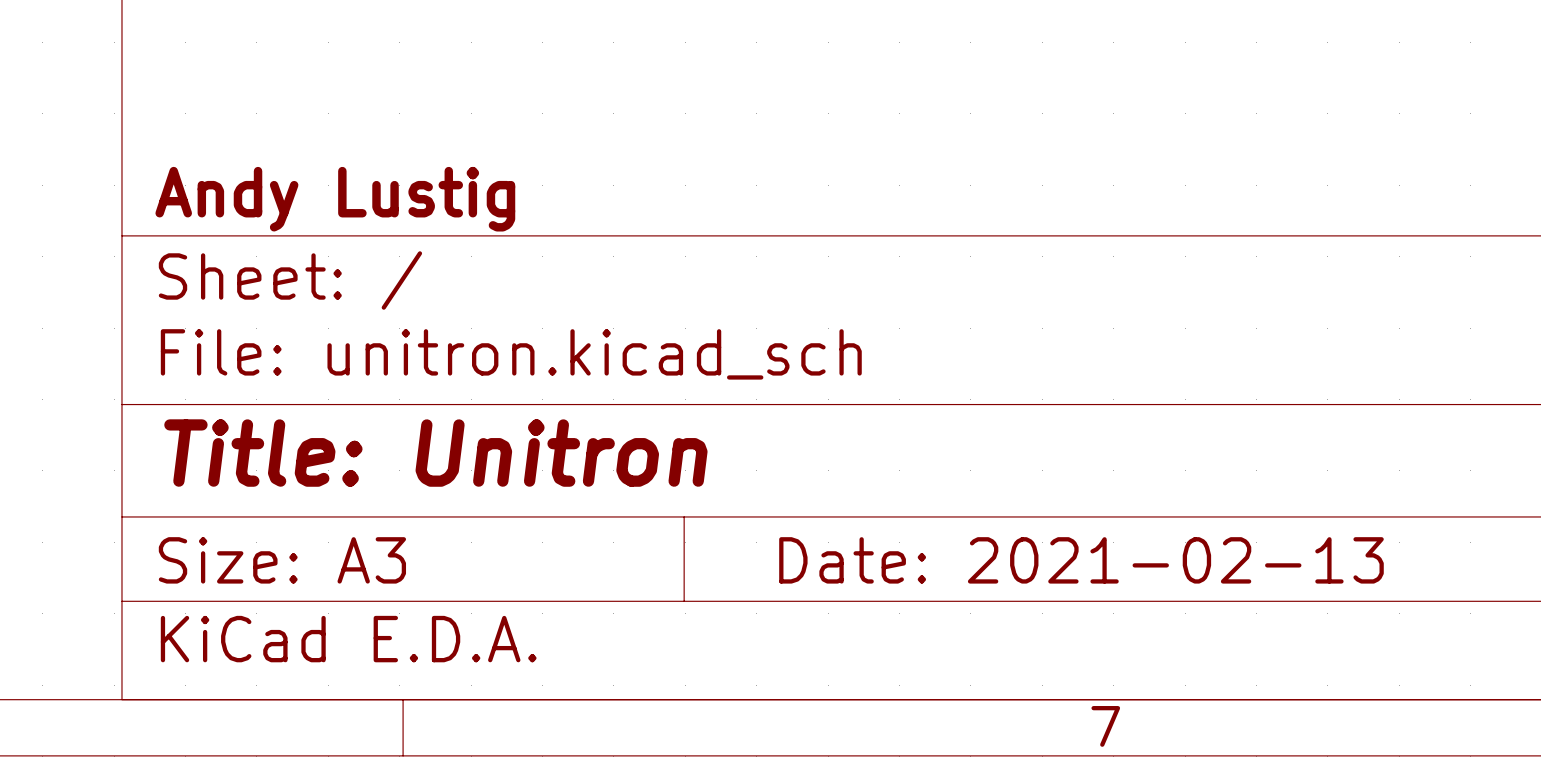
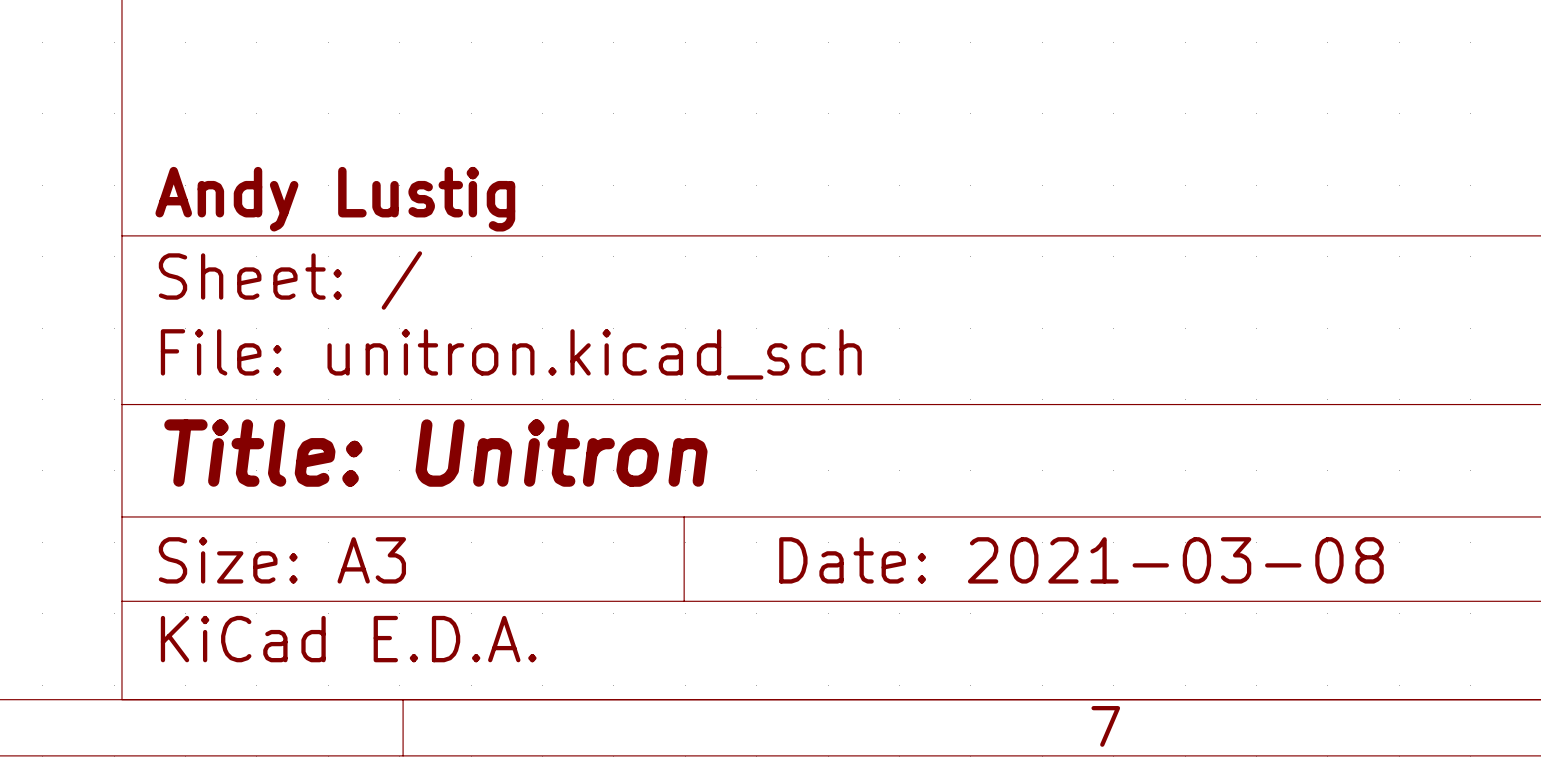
title block: Date: 2021-02-13 (1081, 560) -> Date: 2021-03-08 (1081, 560)

